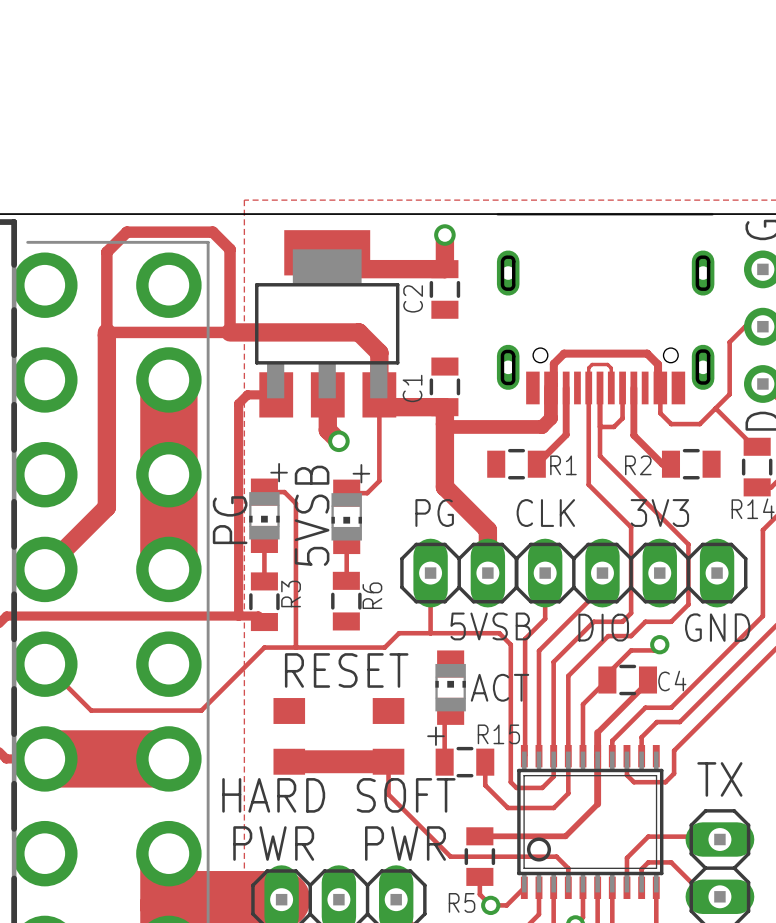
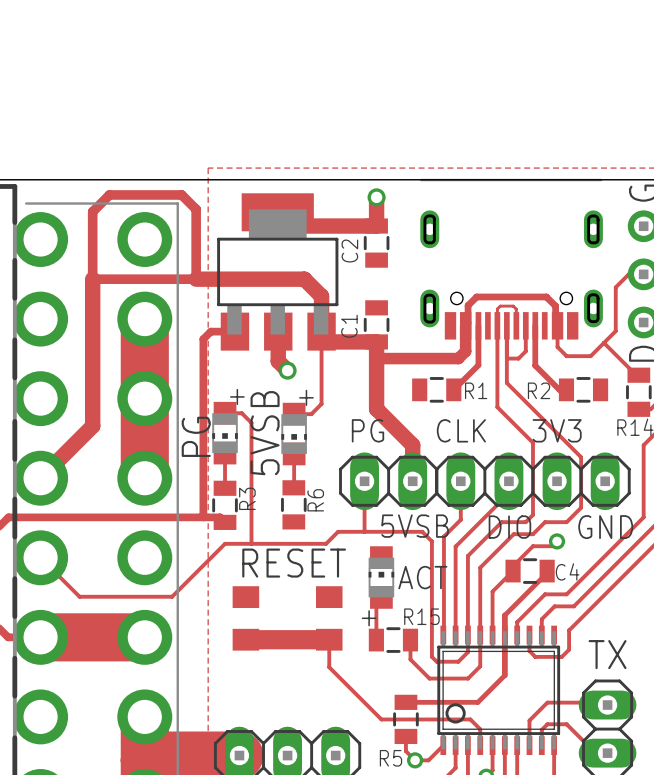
text: HARD (273, 795) -> none
text: SOFT (406, 795) -> none
text: PWR (273, 843) -> none
text: PWR (405, 843) -> none

